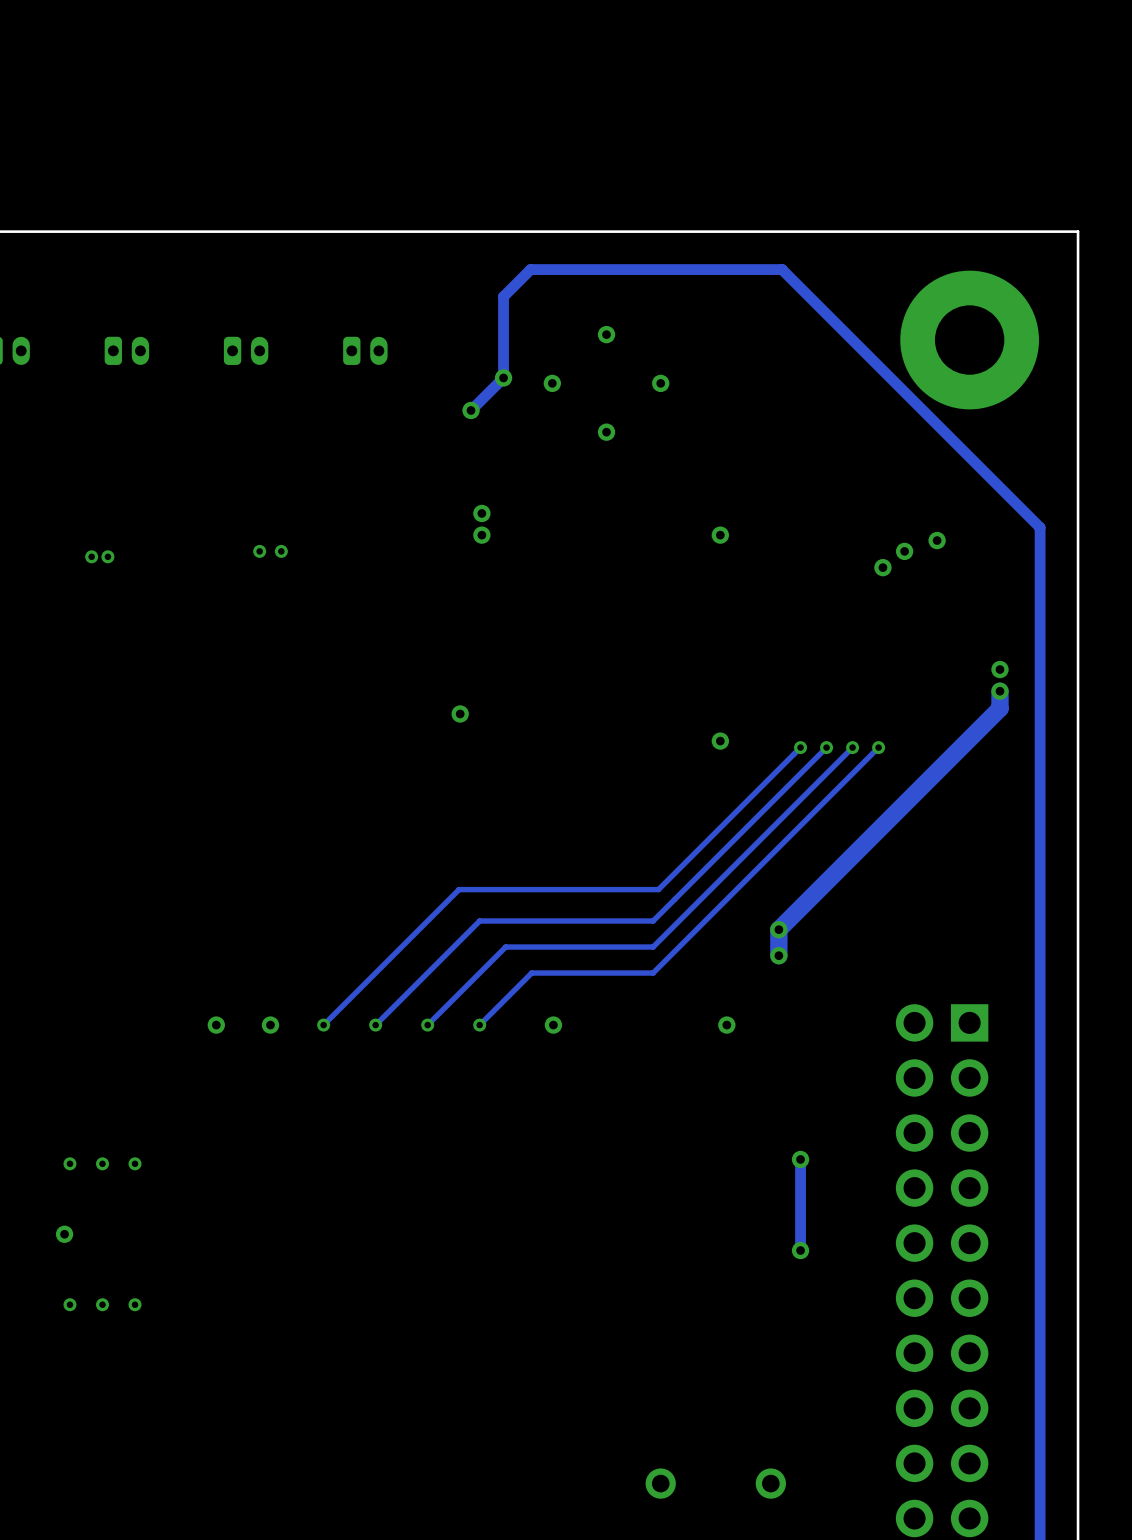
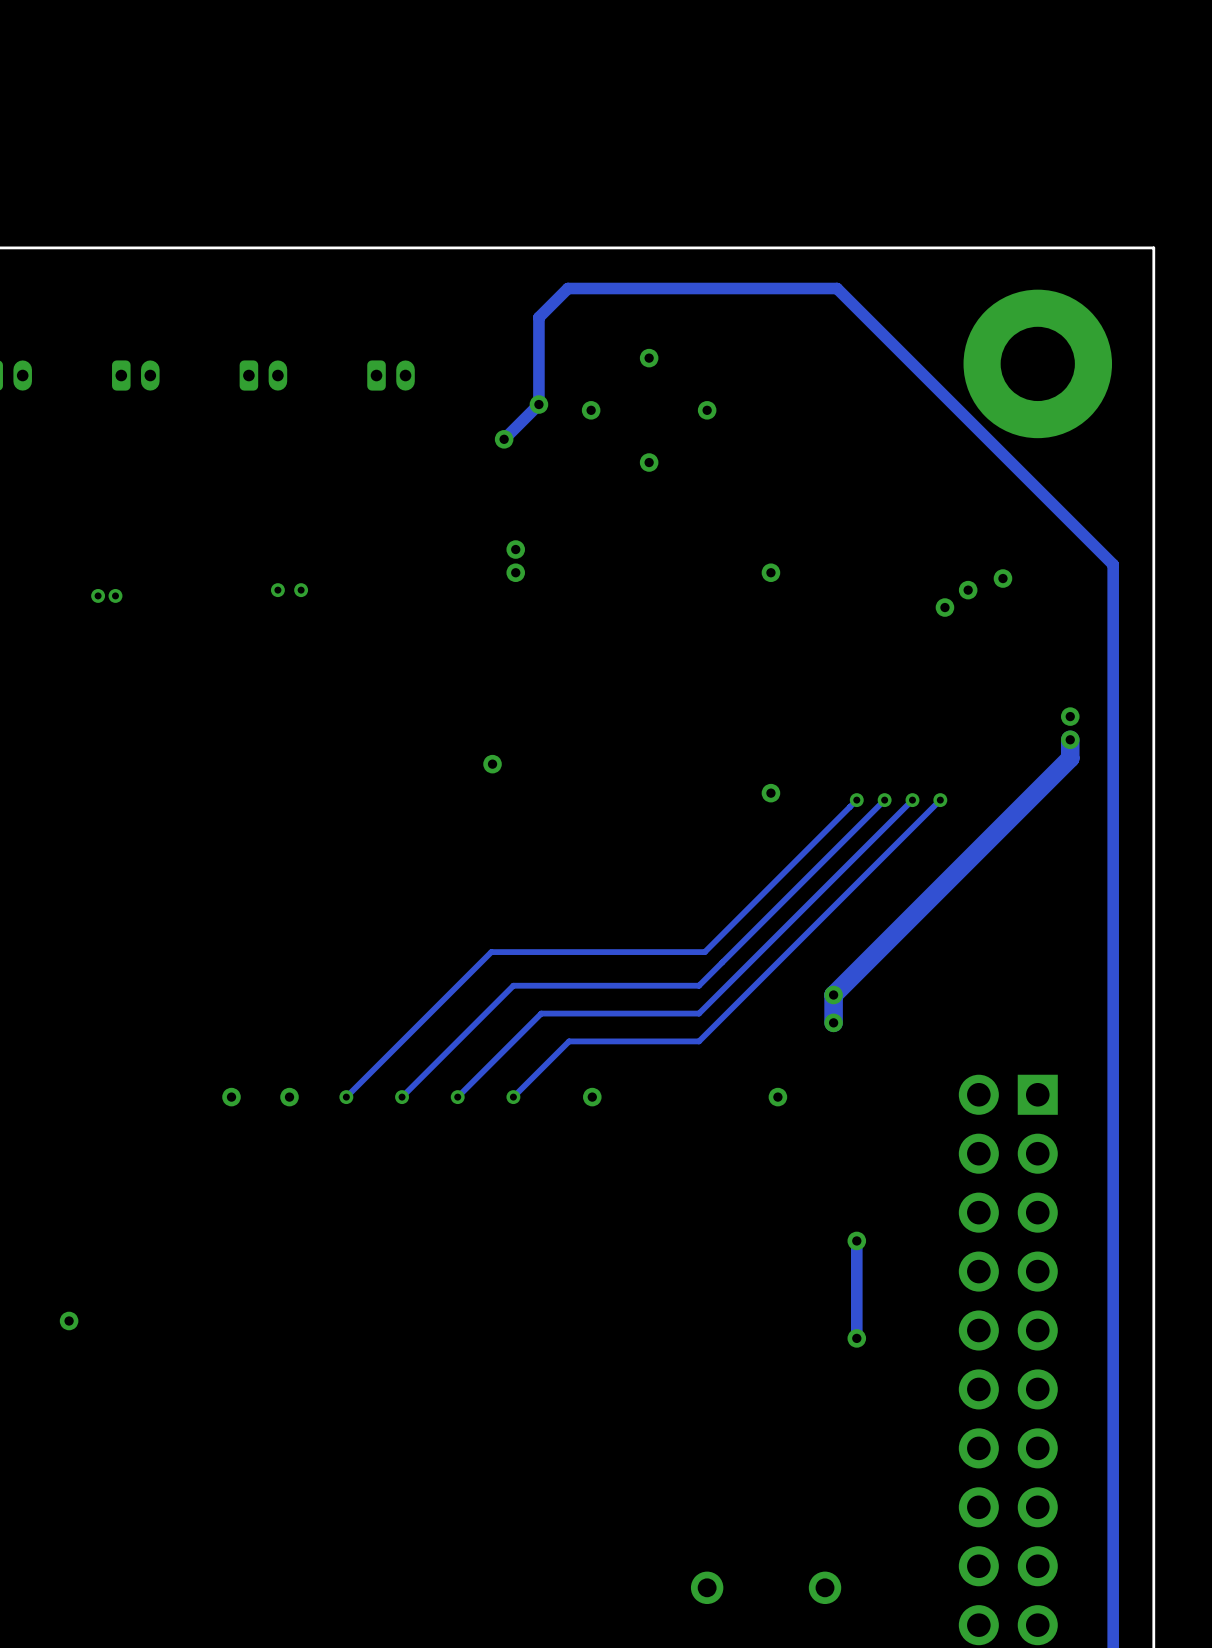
via: (69, 1163) -> none
via: (102, 1163) -> none
via: (135, 1163) -> none
via: (69, 1304) -> none
via: (102, 1304) -> none
via: (135, 1304) -> none

